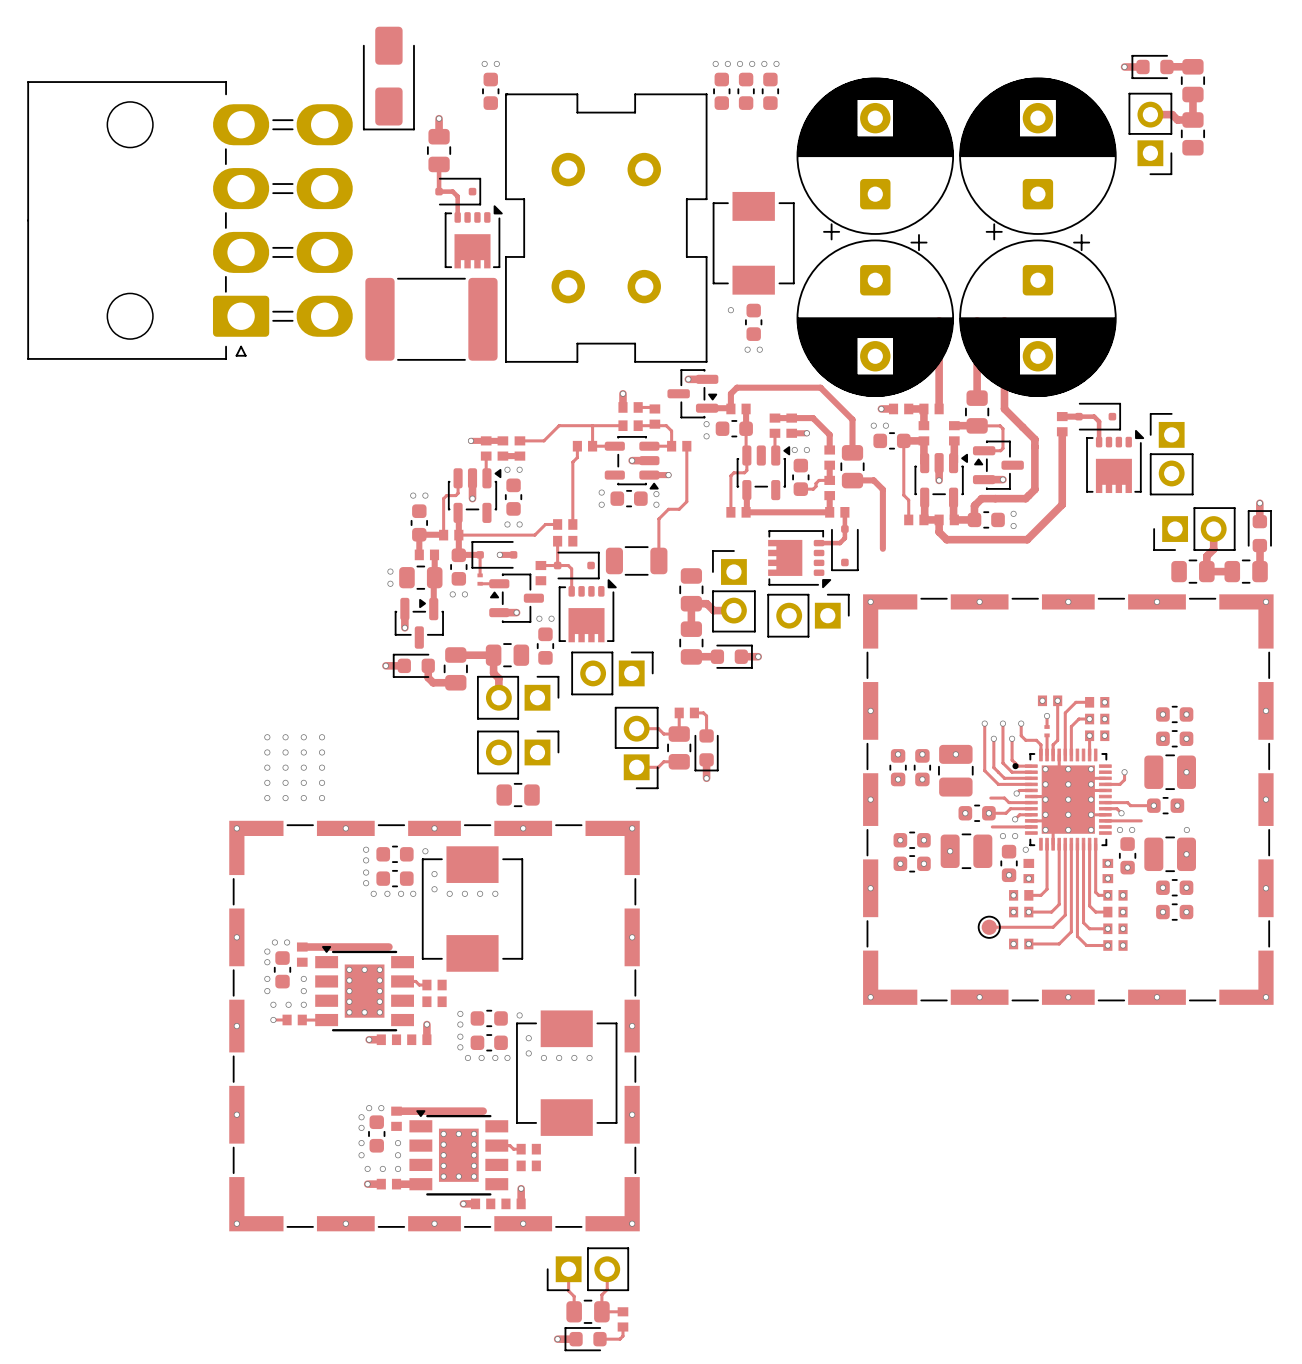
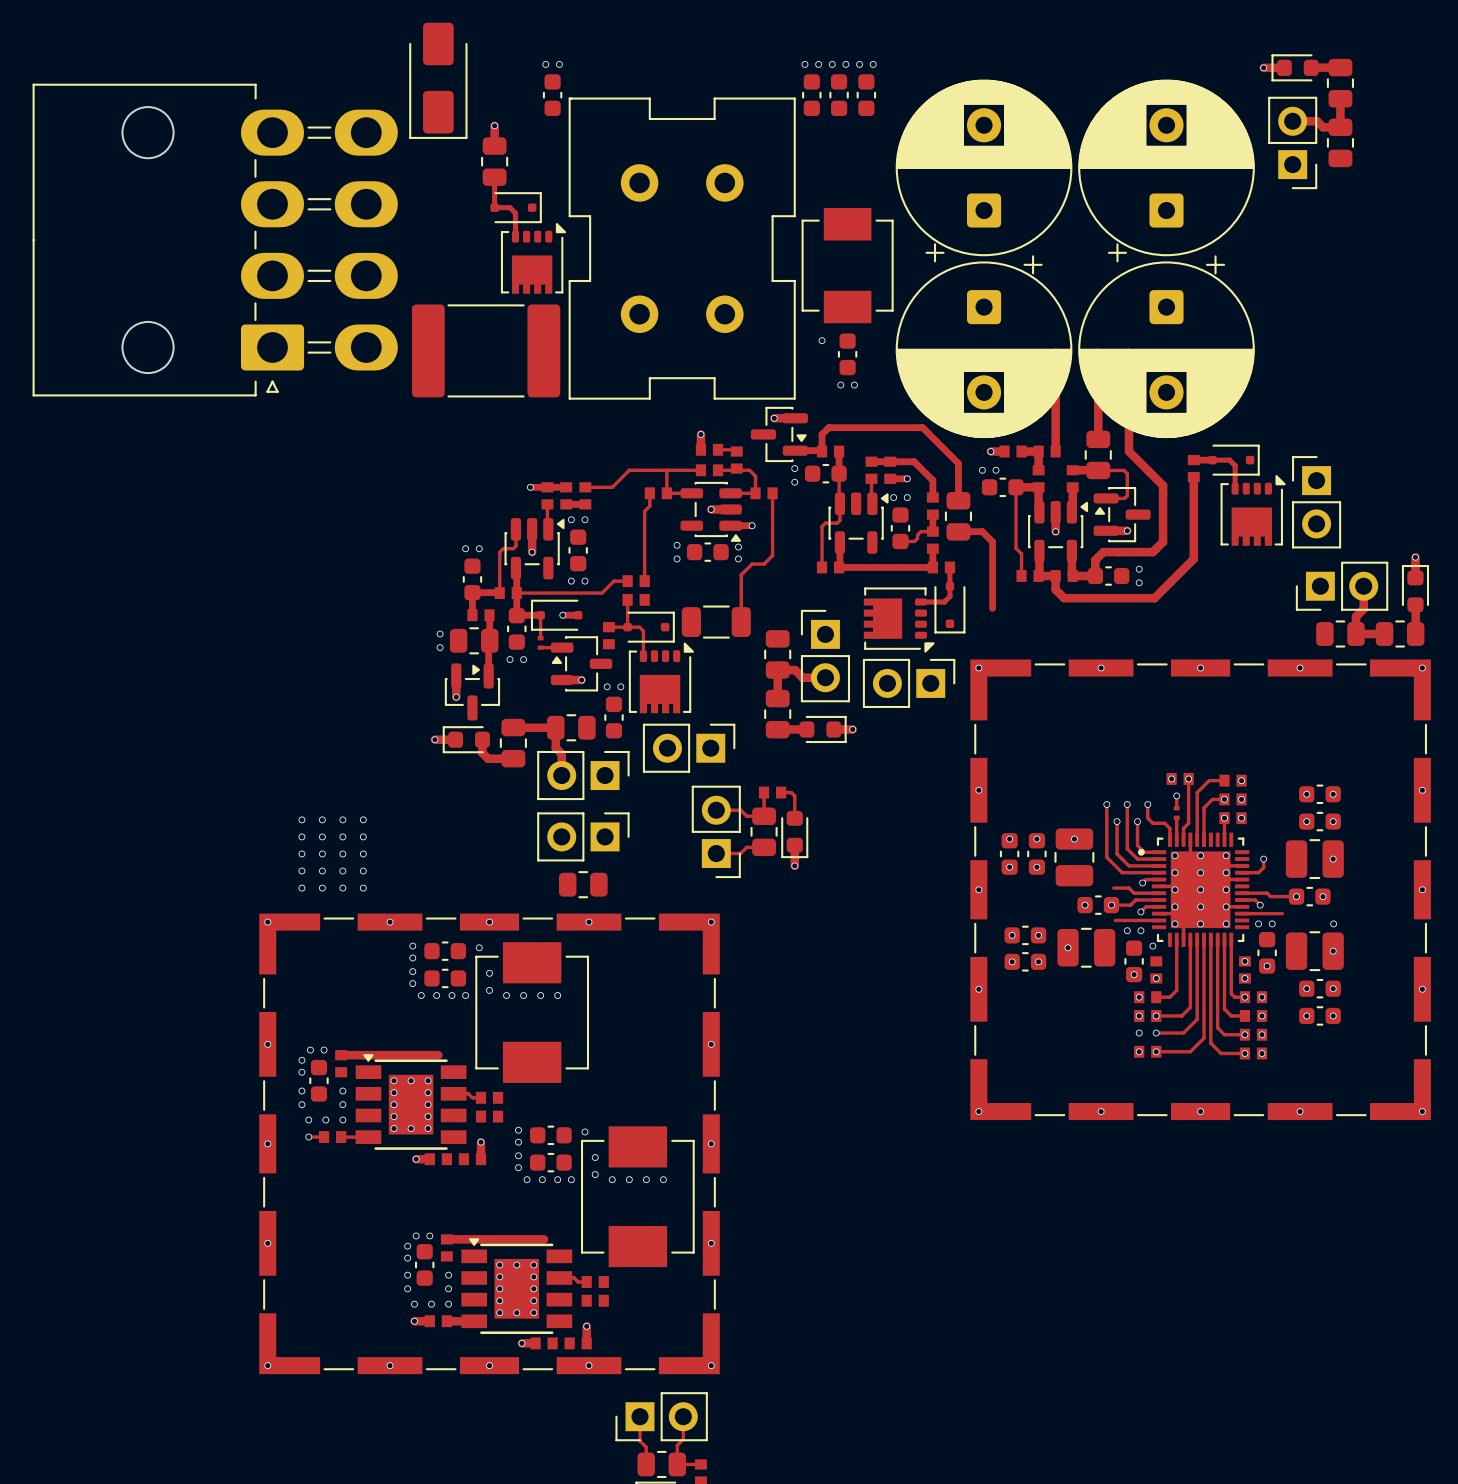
track: (989, 927) (1028, 927) -> none
part: (989, 927) -> none
via: none -> (1139, 1033)
via: none -> (1156, 1033)

